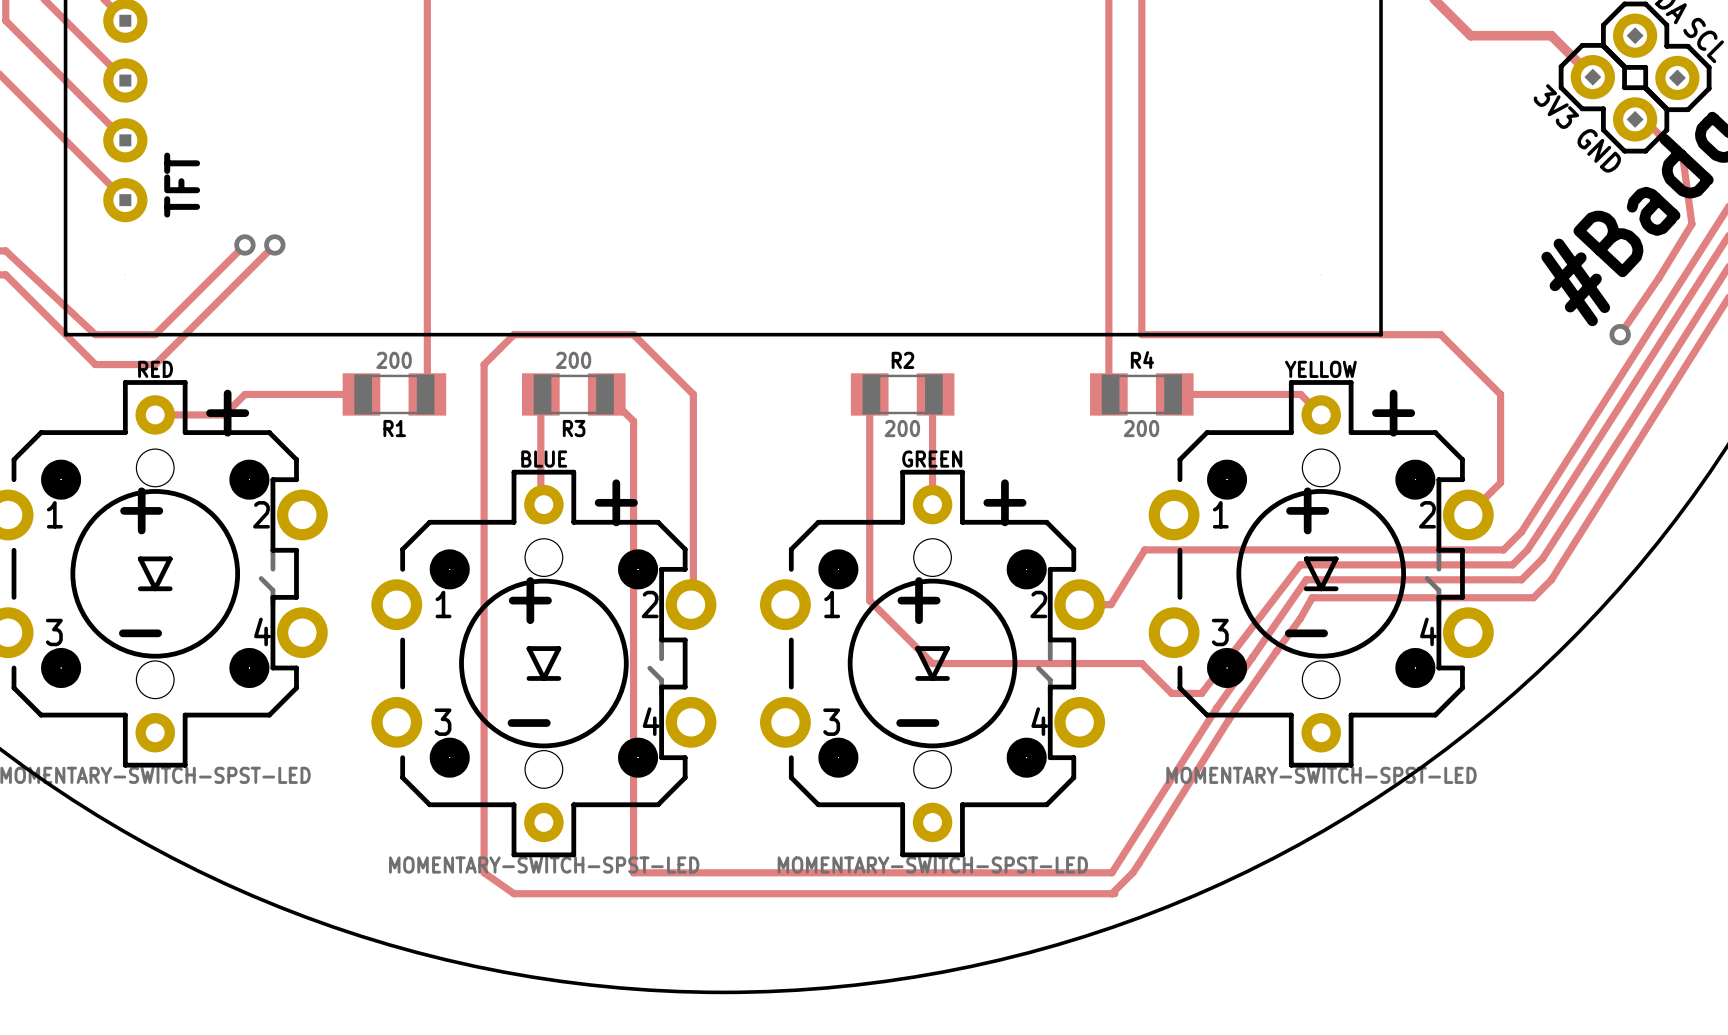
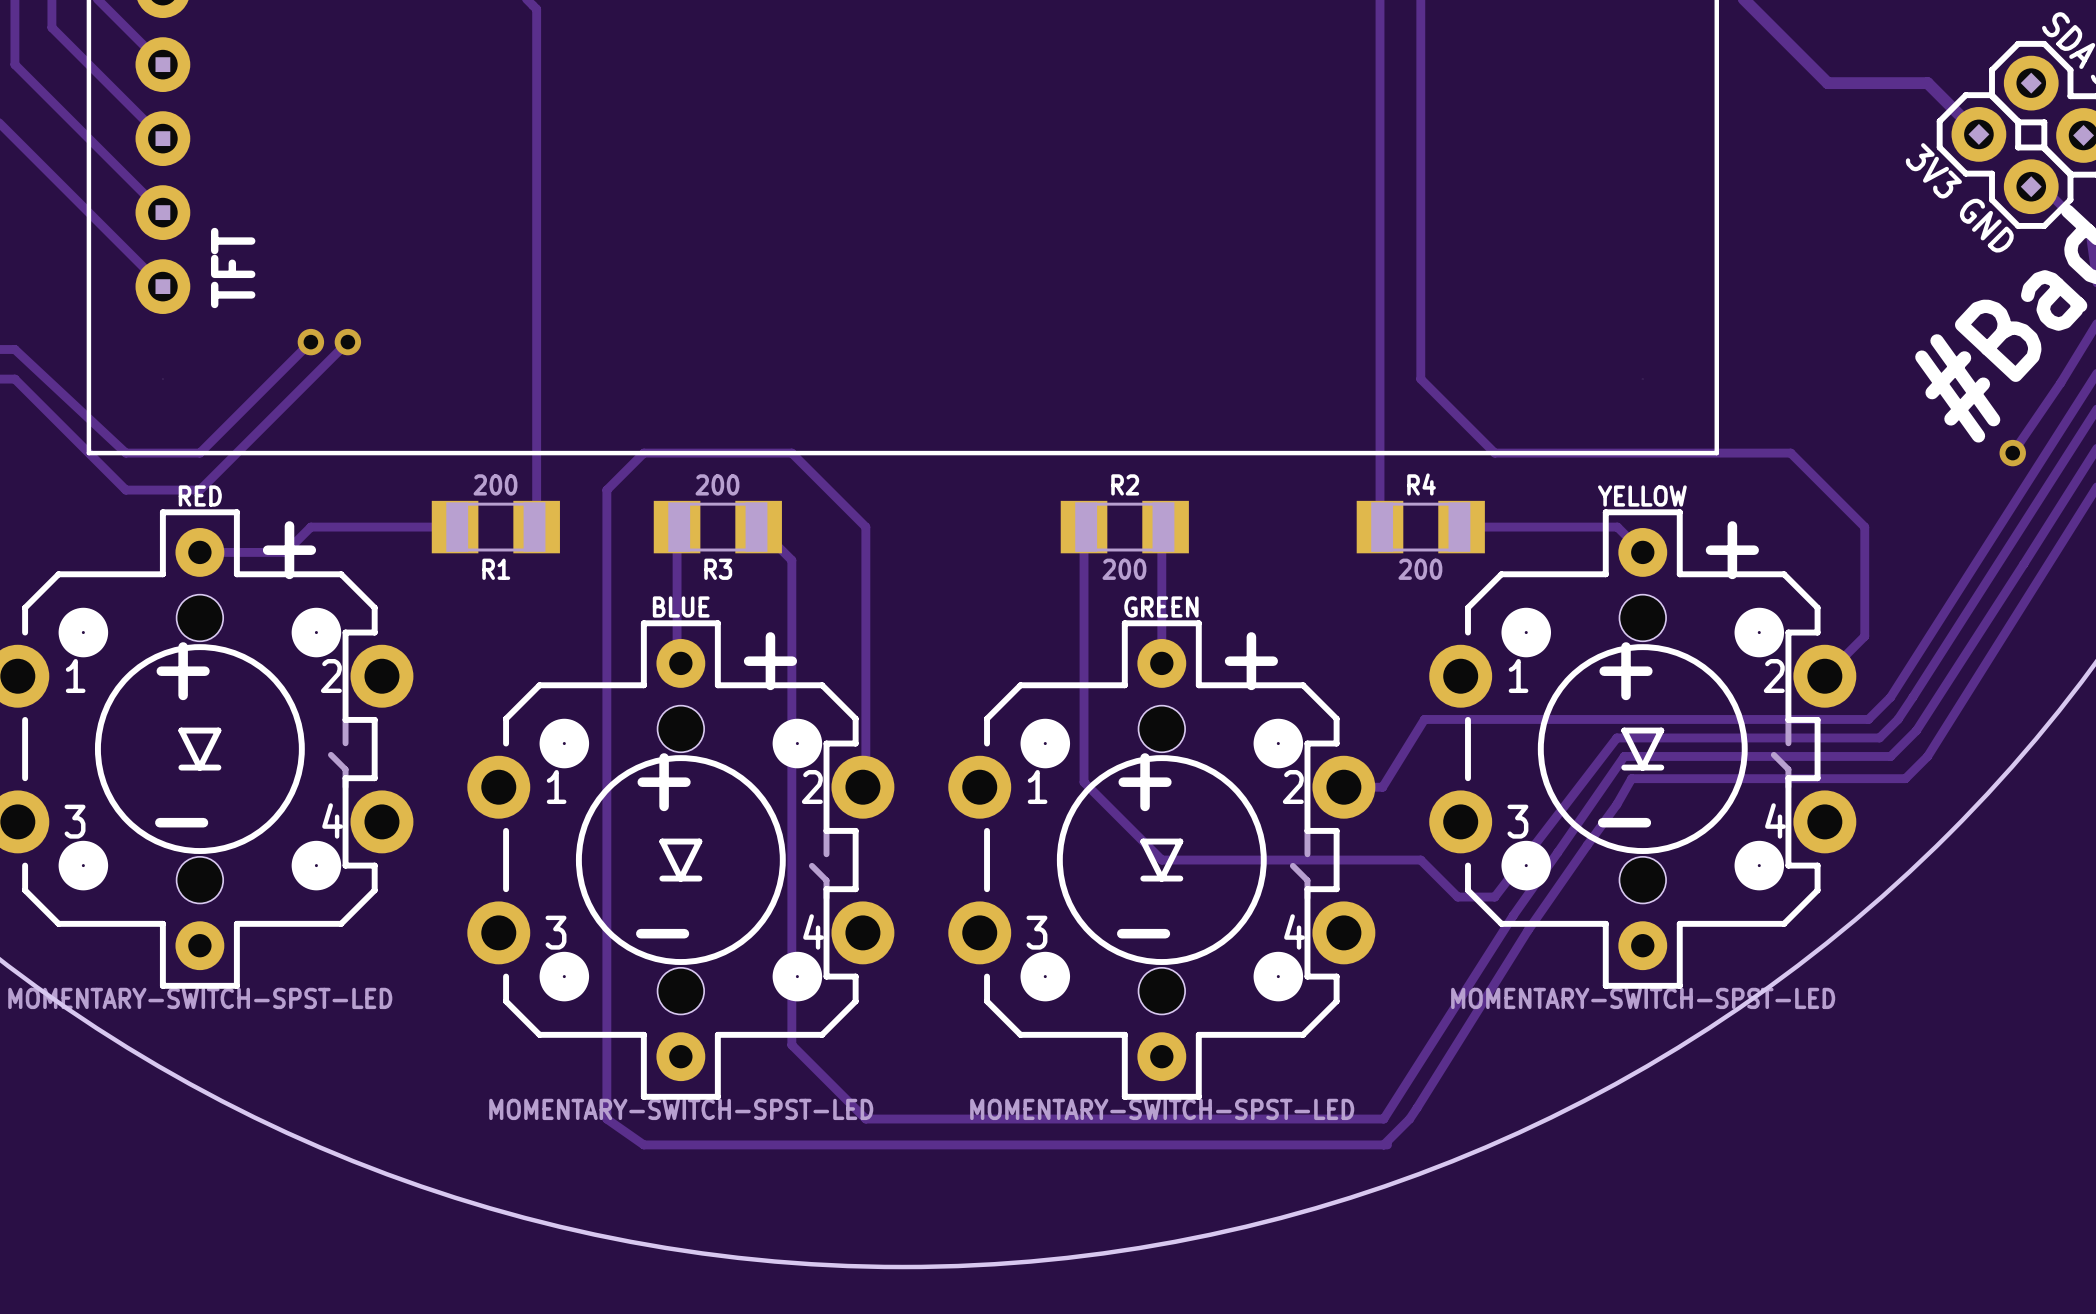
track: (1141, 274) (1141, 334) (1201, 334) -> (1420, 379) (1494, 453)
track: (633, 813) (633, 872) (693, 872) -> (791, 1045) (865, 1119)

